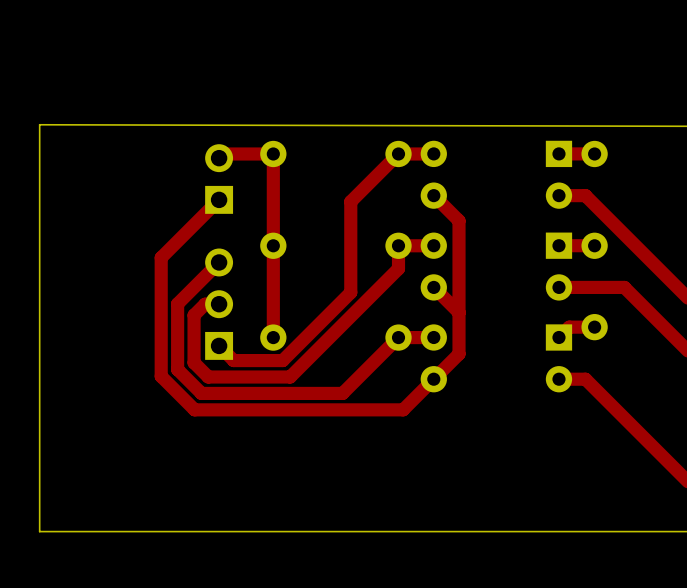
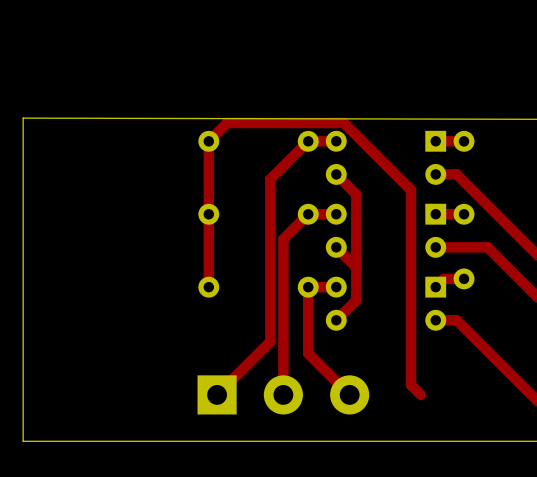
top track: (273, 153) (223, 153) (219, 158) -> (208, 141) (227, 122) (343, 122) (411, 190) (411, 384) (420, 394)
part: (219, 179) -> none
top track: (219, 199) (161, 257) (161, 376) (194, 409) (403, 409) (433, 379) -> none
top track: (398, 245) (398, 268) (290, 377) (208, 377) (194, 362) (194, 315) (205, 304) (219, 304) -> (308, 214) (283, 239) (283, 394)
top track: (219, 262) (177, 303) (177, 369) (201, 393) (342, 393) (398, 337) -> (349, 394) (308, 353) (308, 287)
top track: (350, 292) (282, 360) (233, 360) (219, 345) -> (270, 251) (270, 341) (217, 394)
part: (219, 304) -> none
part: none -> (283, 394)

